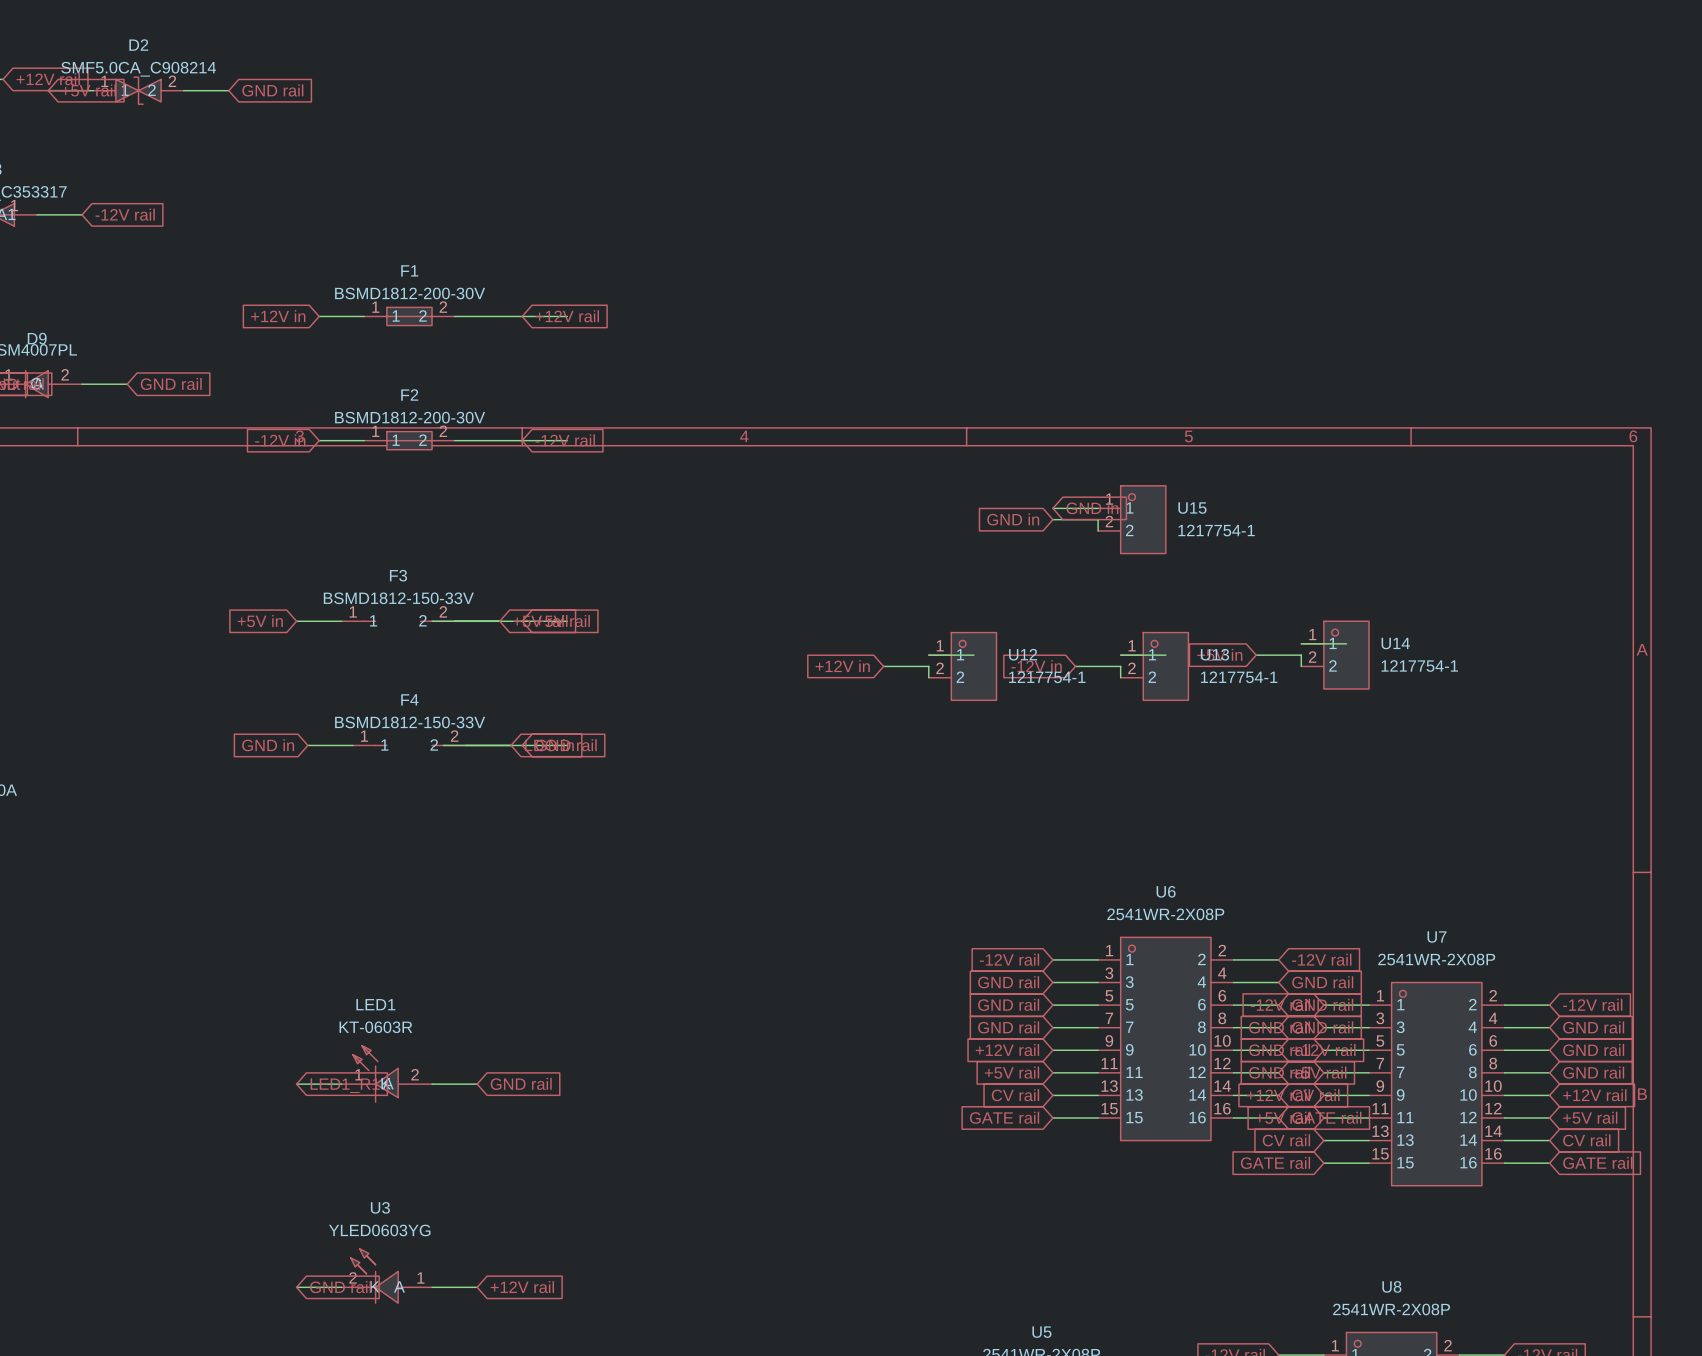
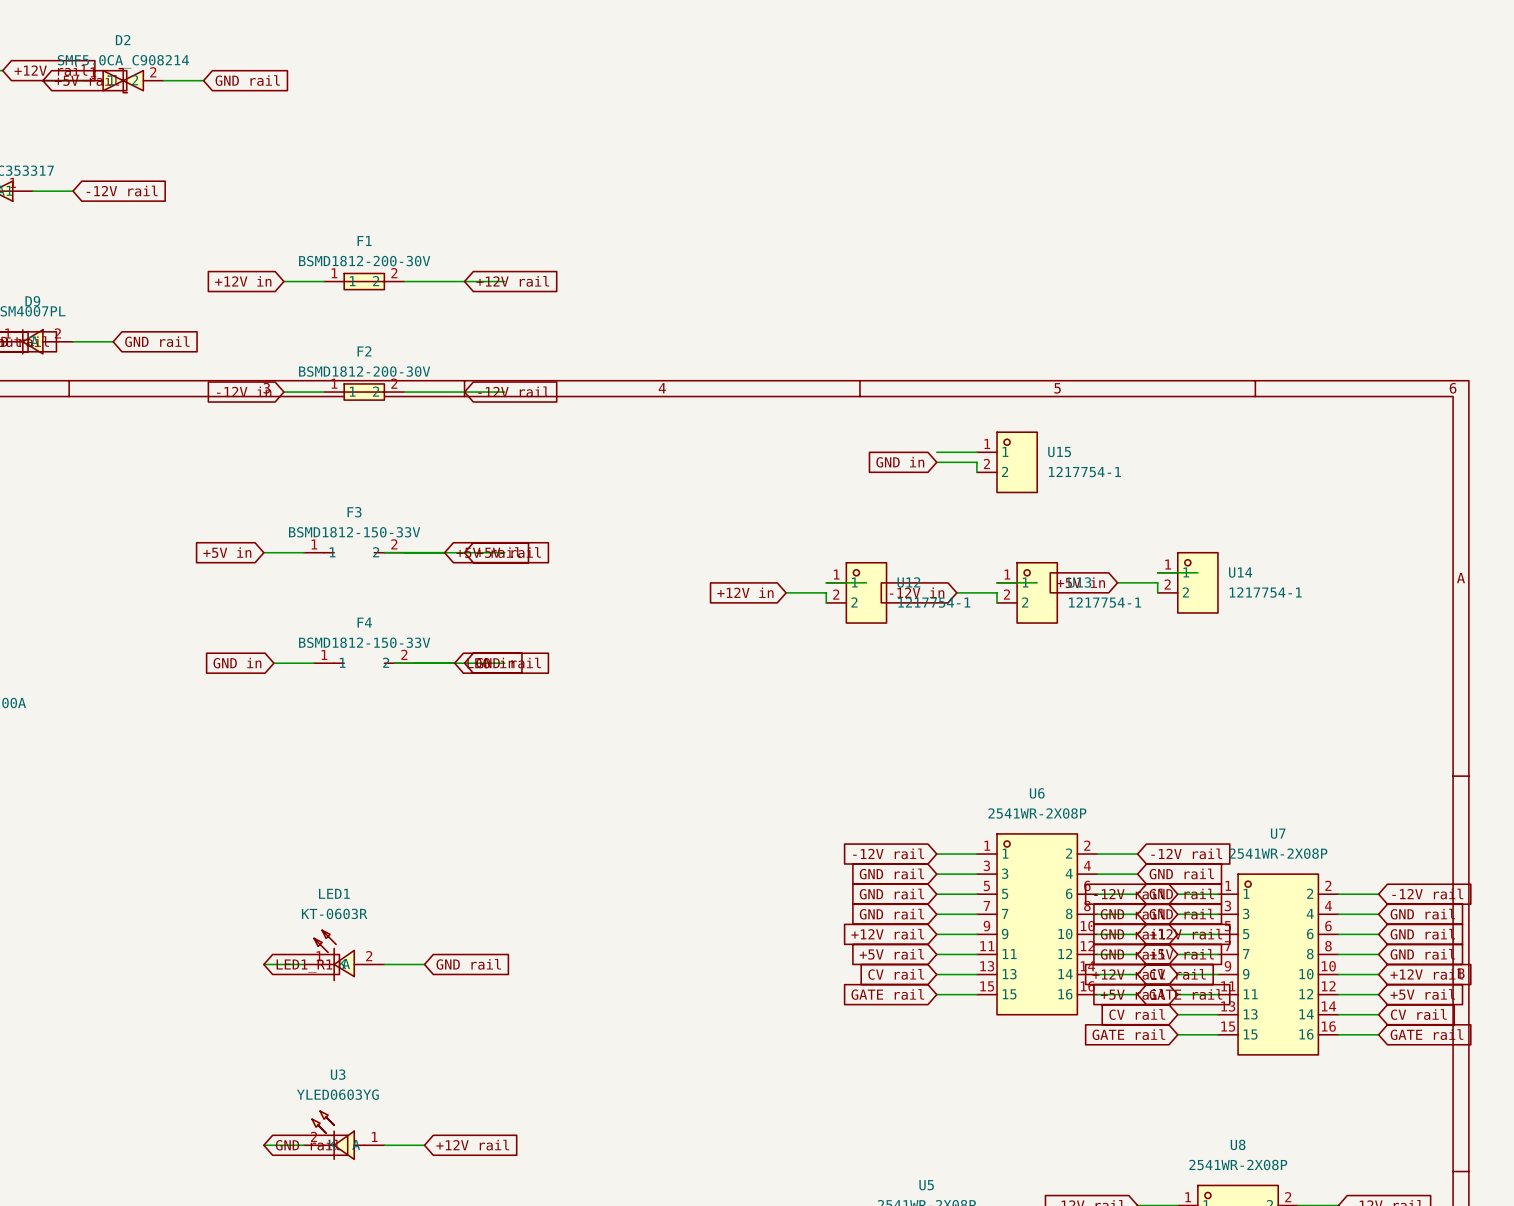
global label: GND in (1092, 508) -> none

